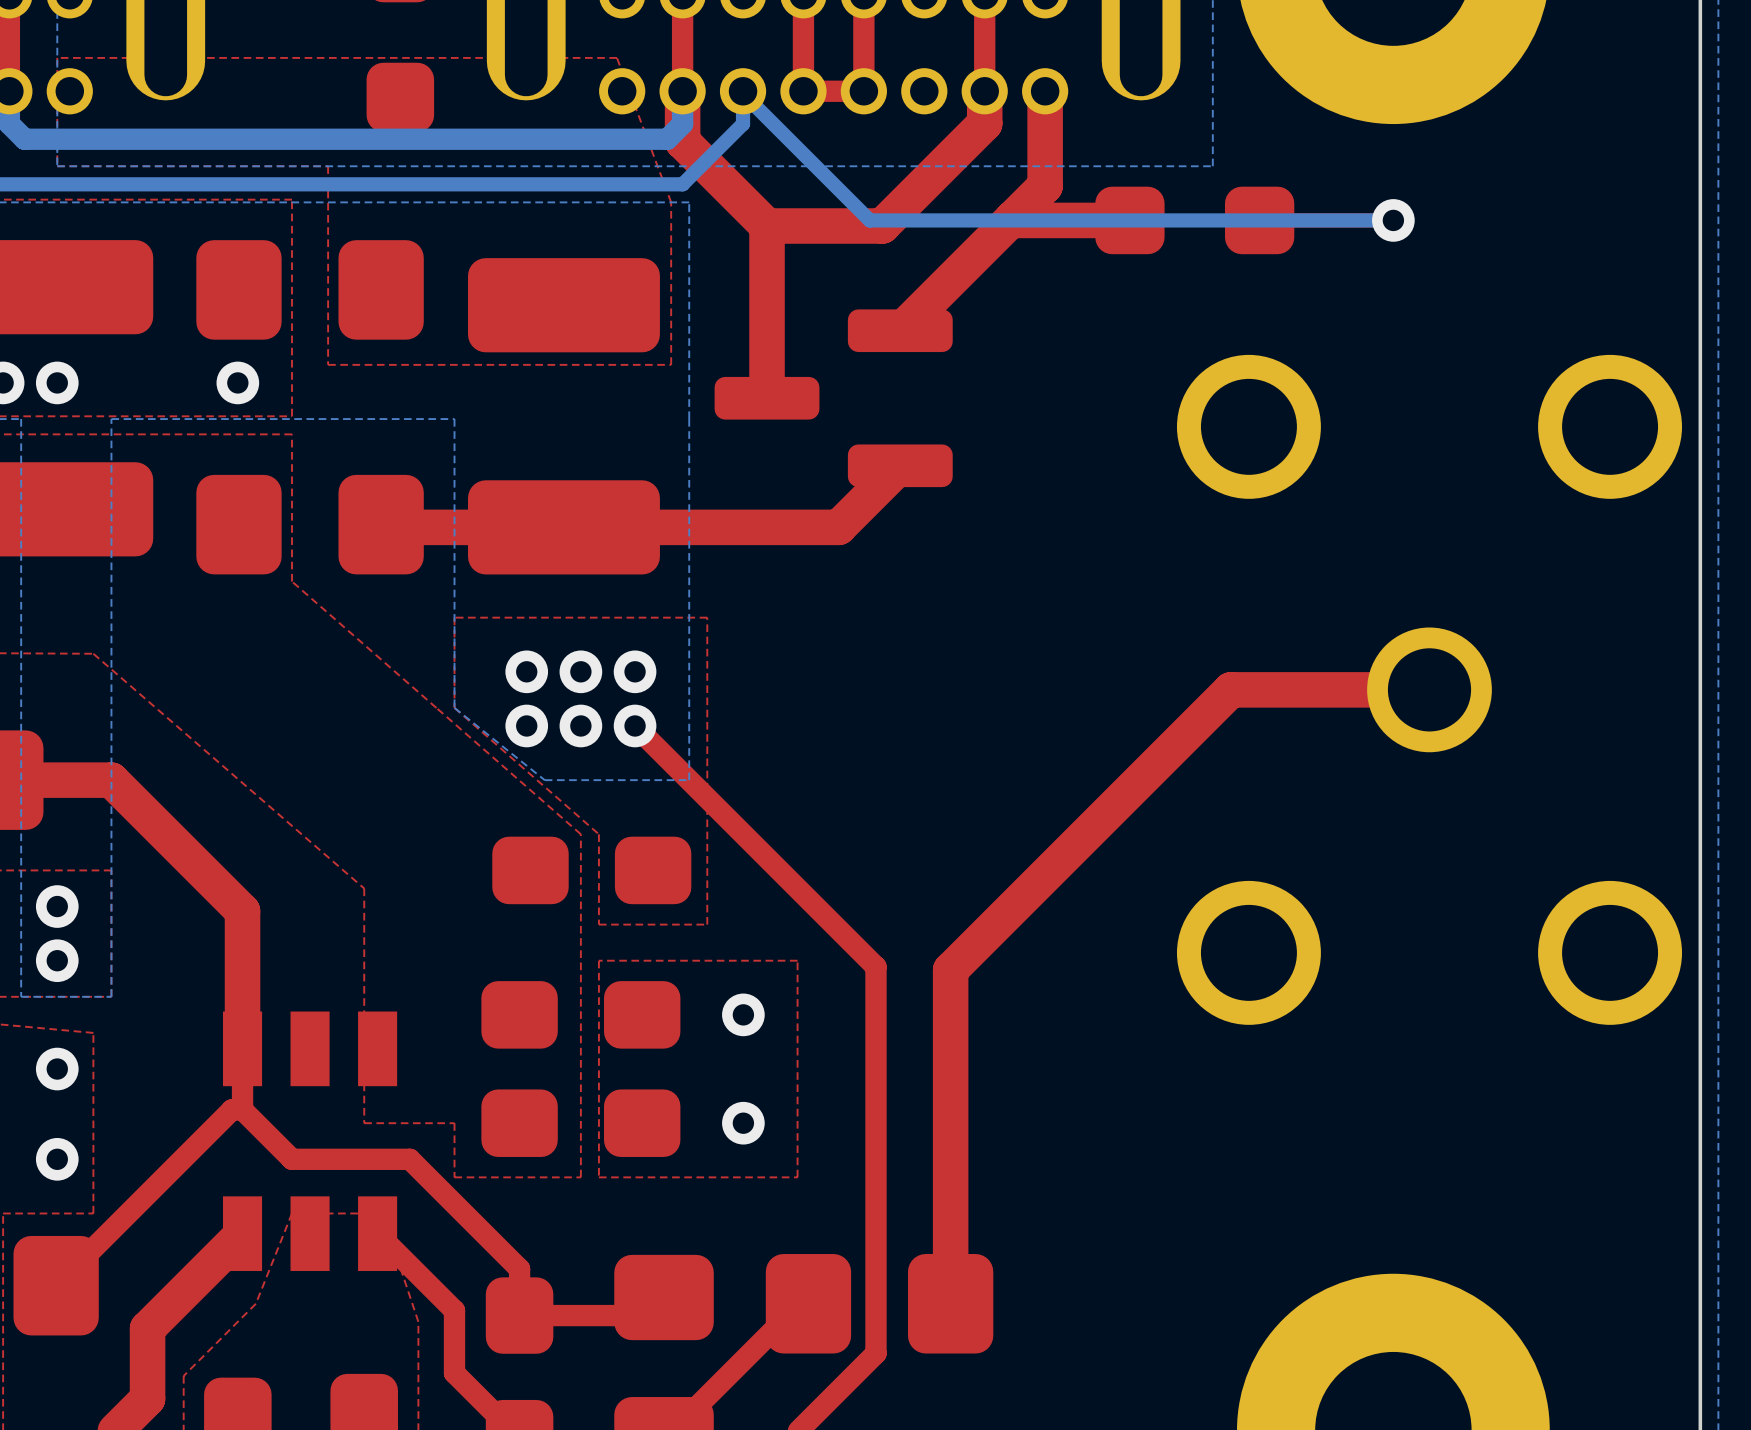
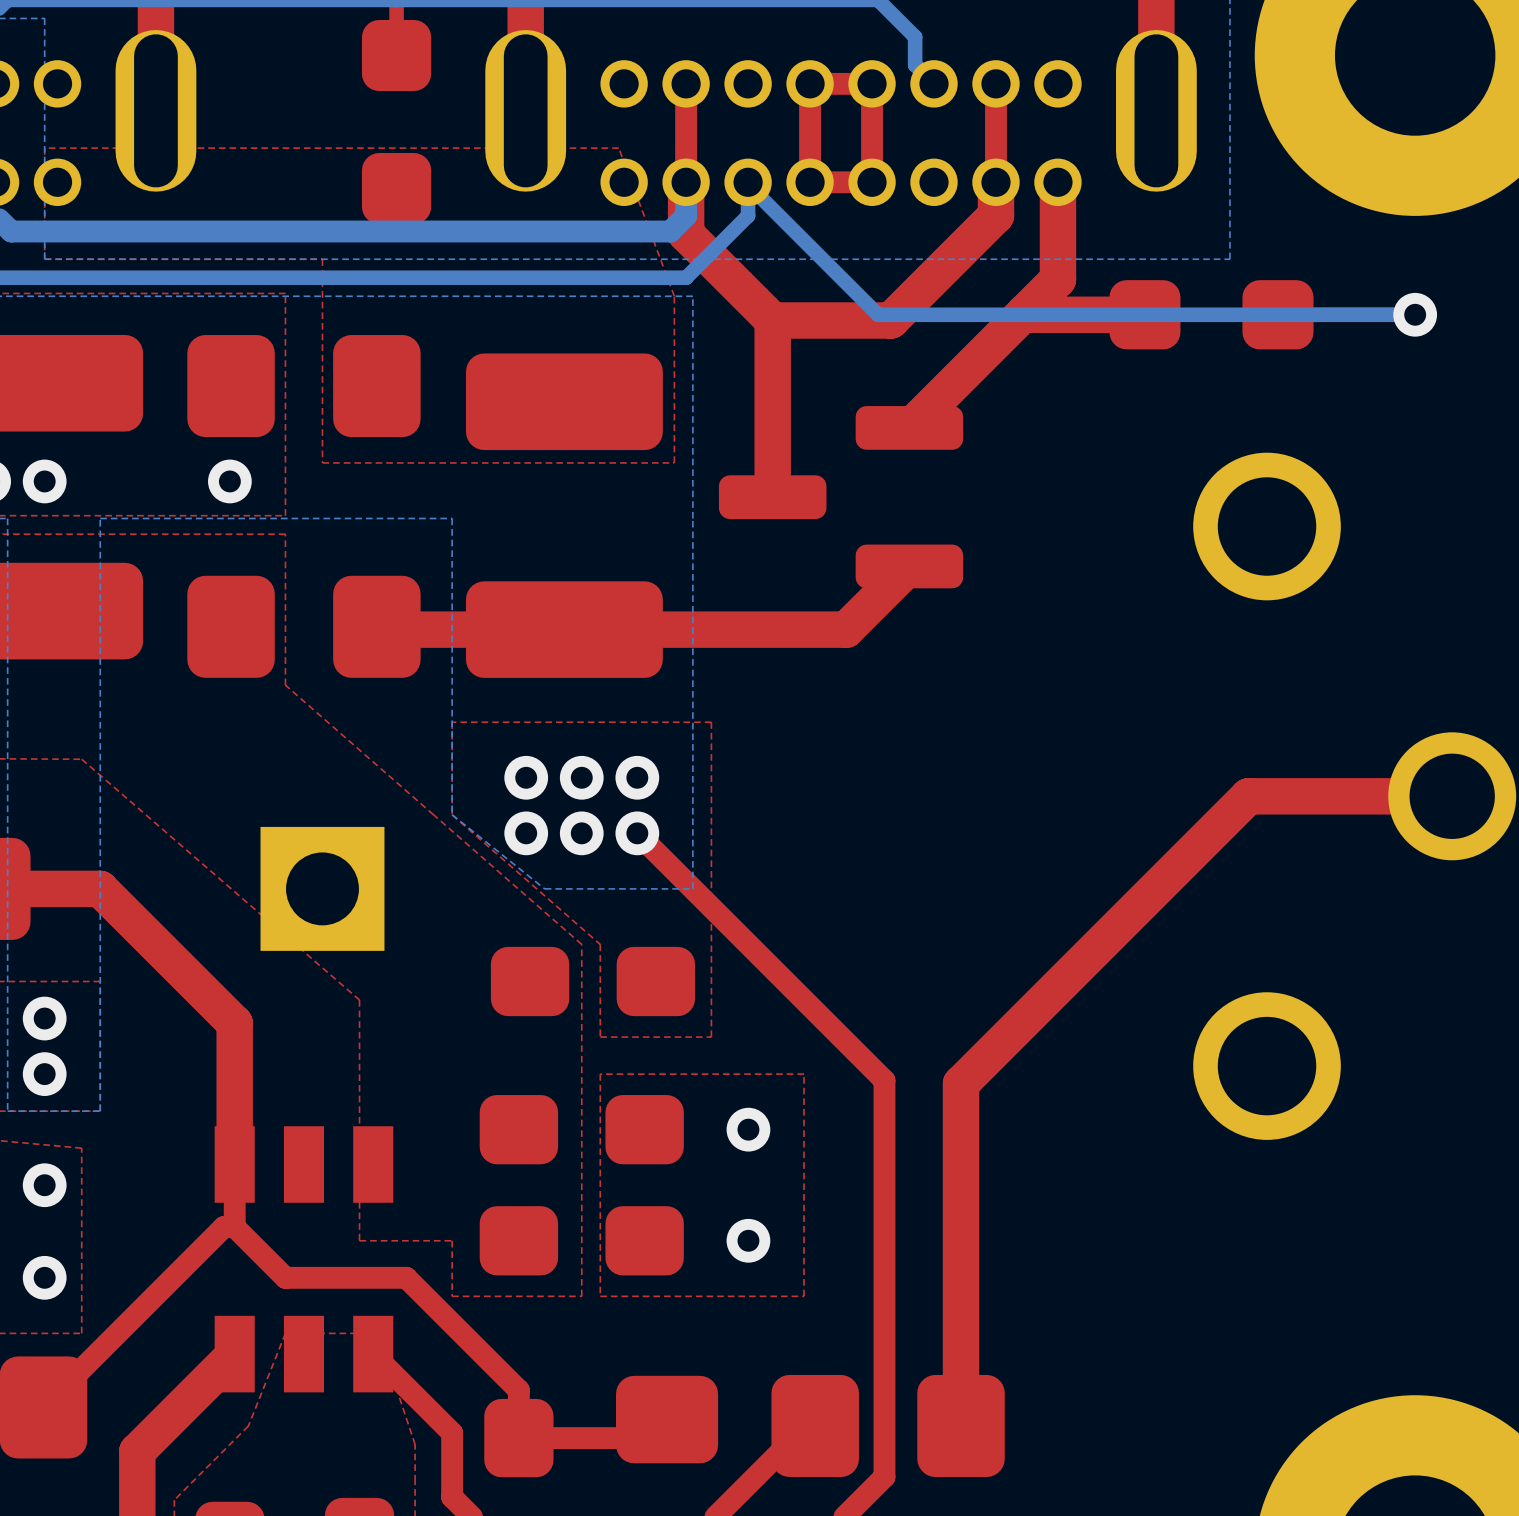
part: none -> (322, 888)

